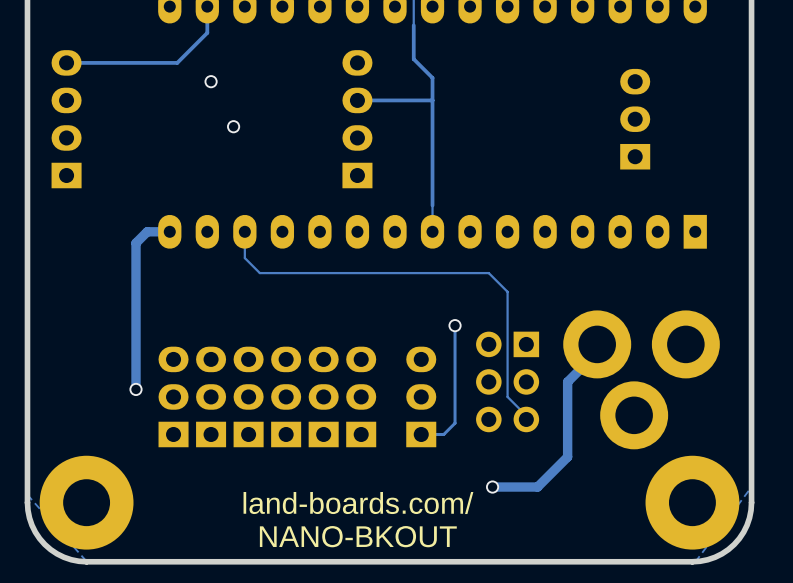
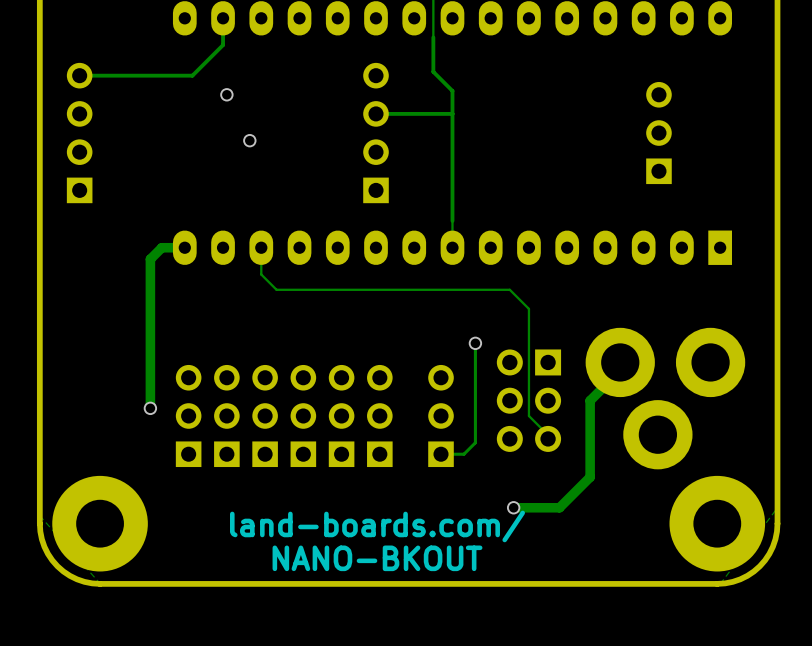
part footprint: [51, 50, 82, 189] -> [66, 62, 93, 204]
part footprint: [342, 50, 373, 189] -> [363, 62, 389, 204]
part footprint: [620, 68, 651, 170] -> [646, 81, 672, 185]
part footprint: [158, 346, 189, 448] -> [175, 364, 202, 468]
part footprint: [196, 346, 227, 448] -> [214, 364, 240, 468]
part footprint: [233, 346, 264, 448] -> [252, 364, 278, 468]
part footprint: [271, 346, 302, 448] -> [290, 364, 317, 468]
part footprint: [308, 346, 339, 448] -> [328, 364, 355, 468]
part footprint: [346, 346, 377, 448] -> [367, 364, 393, 468]
part footprint: [406, 346, 437, 448] -> [428, 364, 454, 468]

